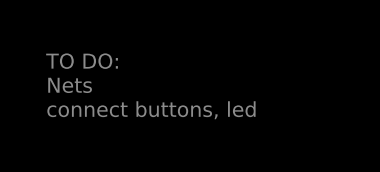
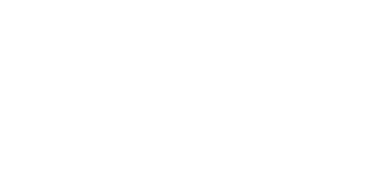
text: TO DO: (82, 61) -> none
text: Nets (70, 85) -> none
text: connect buttons, led (151, 110) -> none

